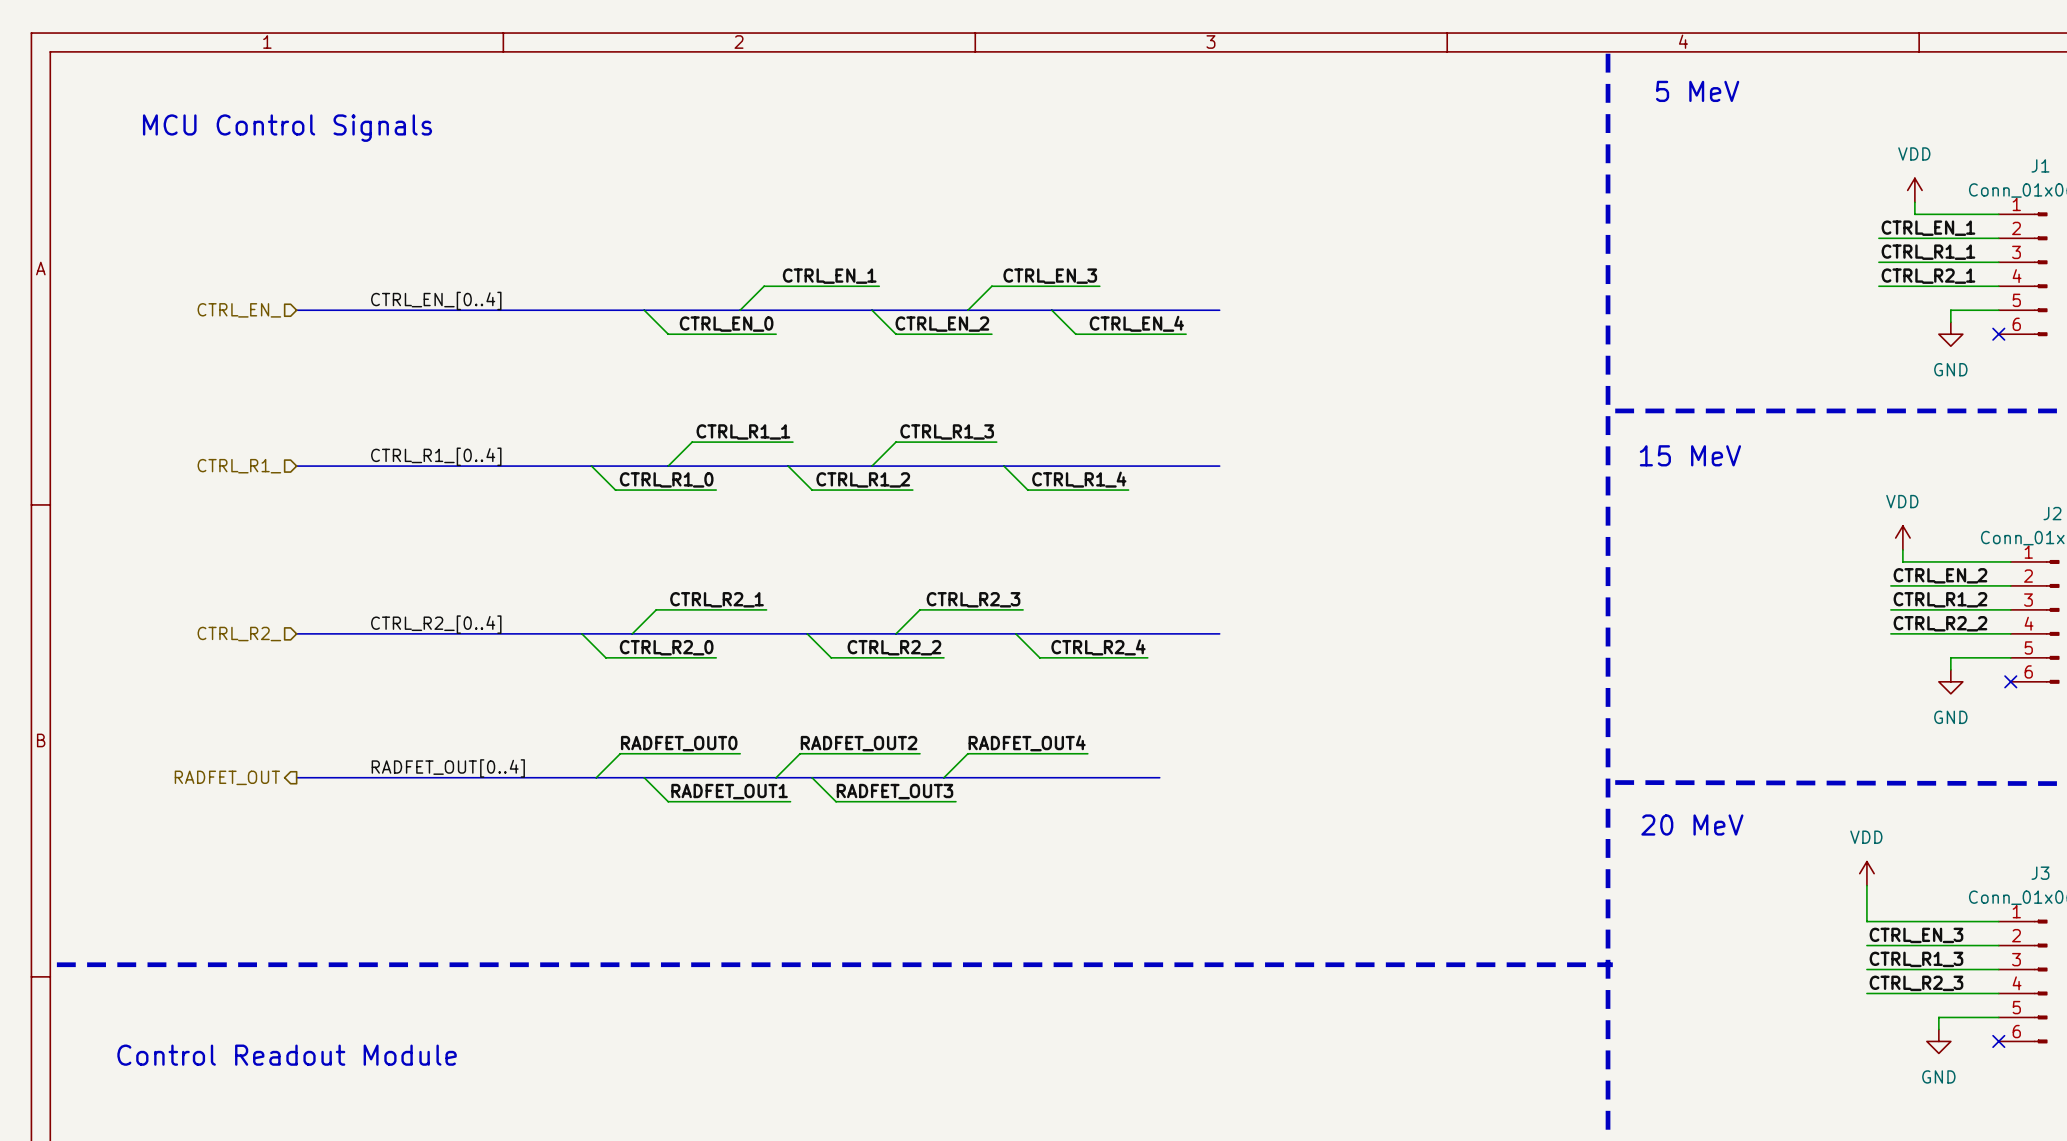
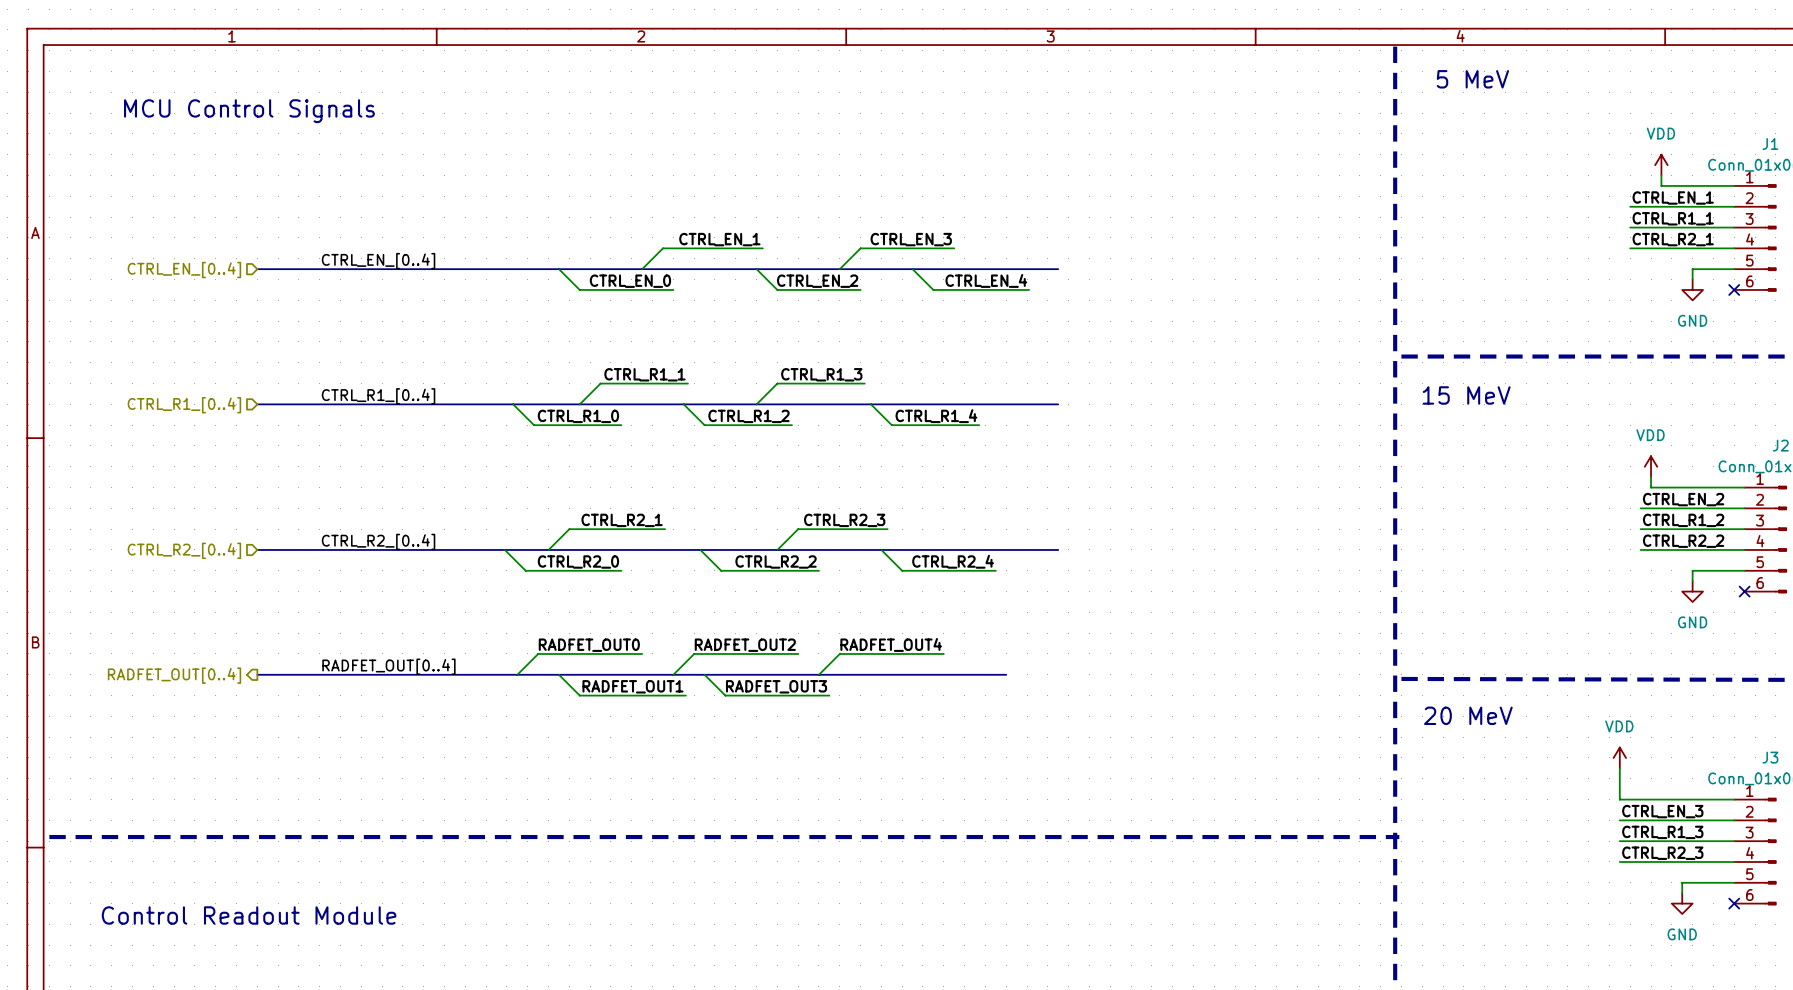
hierarchical label: CTRL_EN_ (239, 310) -> CTRL_EN_[0..4] (184, 270)
hierarchical label: CTRL_R1_ (239, 466) -> CTRL_R1_[0..4] (184, 405)
hierarchical label: CTRL_R2_ (239, 634) -> CTRL_R2_[0..4] (184, 550)
hierarchical label: RADFET_OUT (227, 777) -> RADFET_OUT[0..4] (174, 675)

